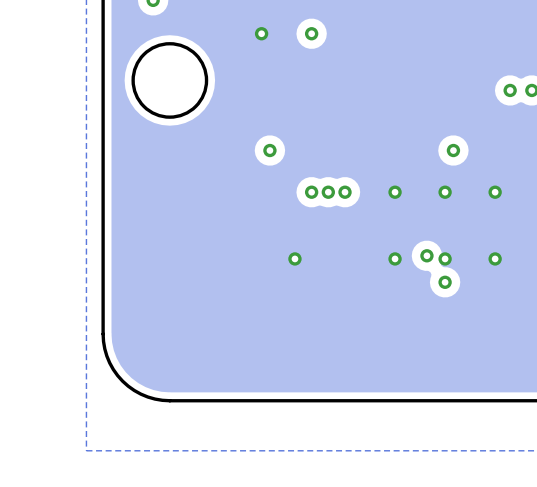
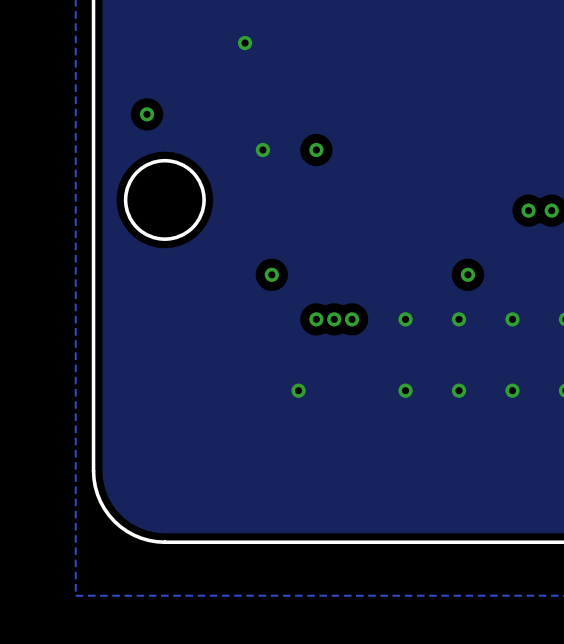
via: (426, 255) -> none
via: (445, 282) -> none

